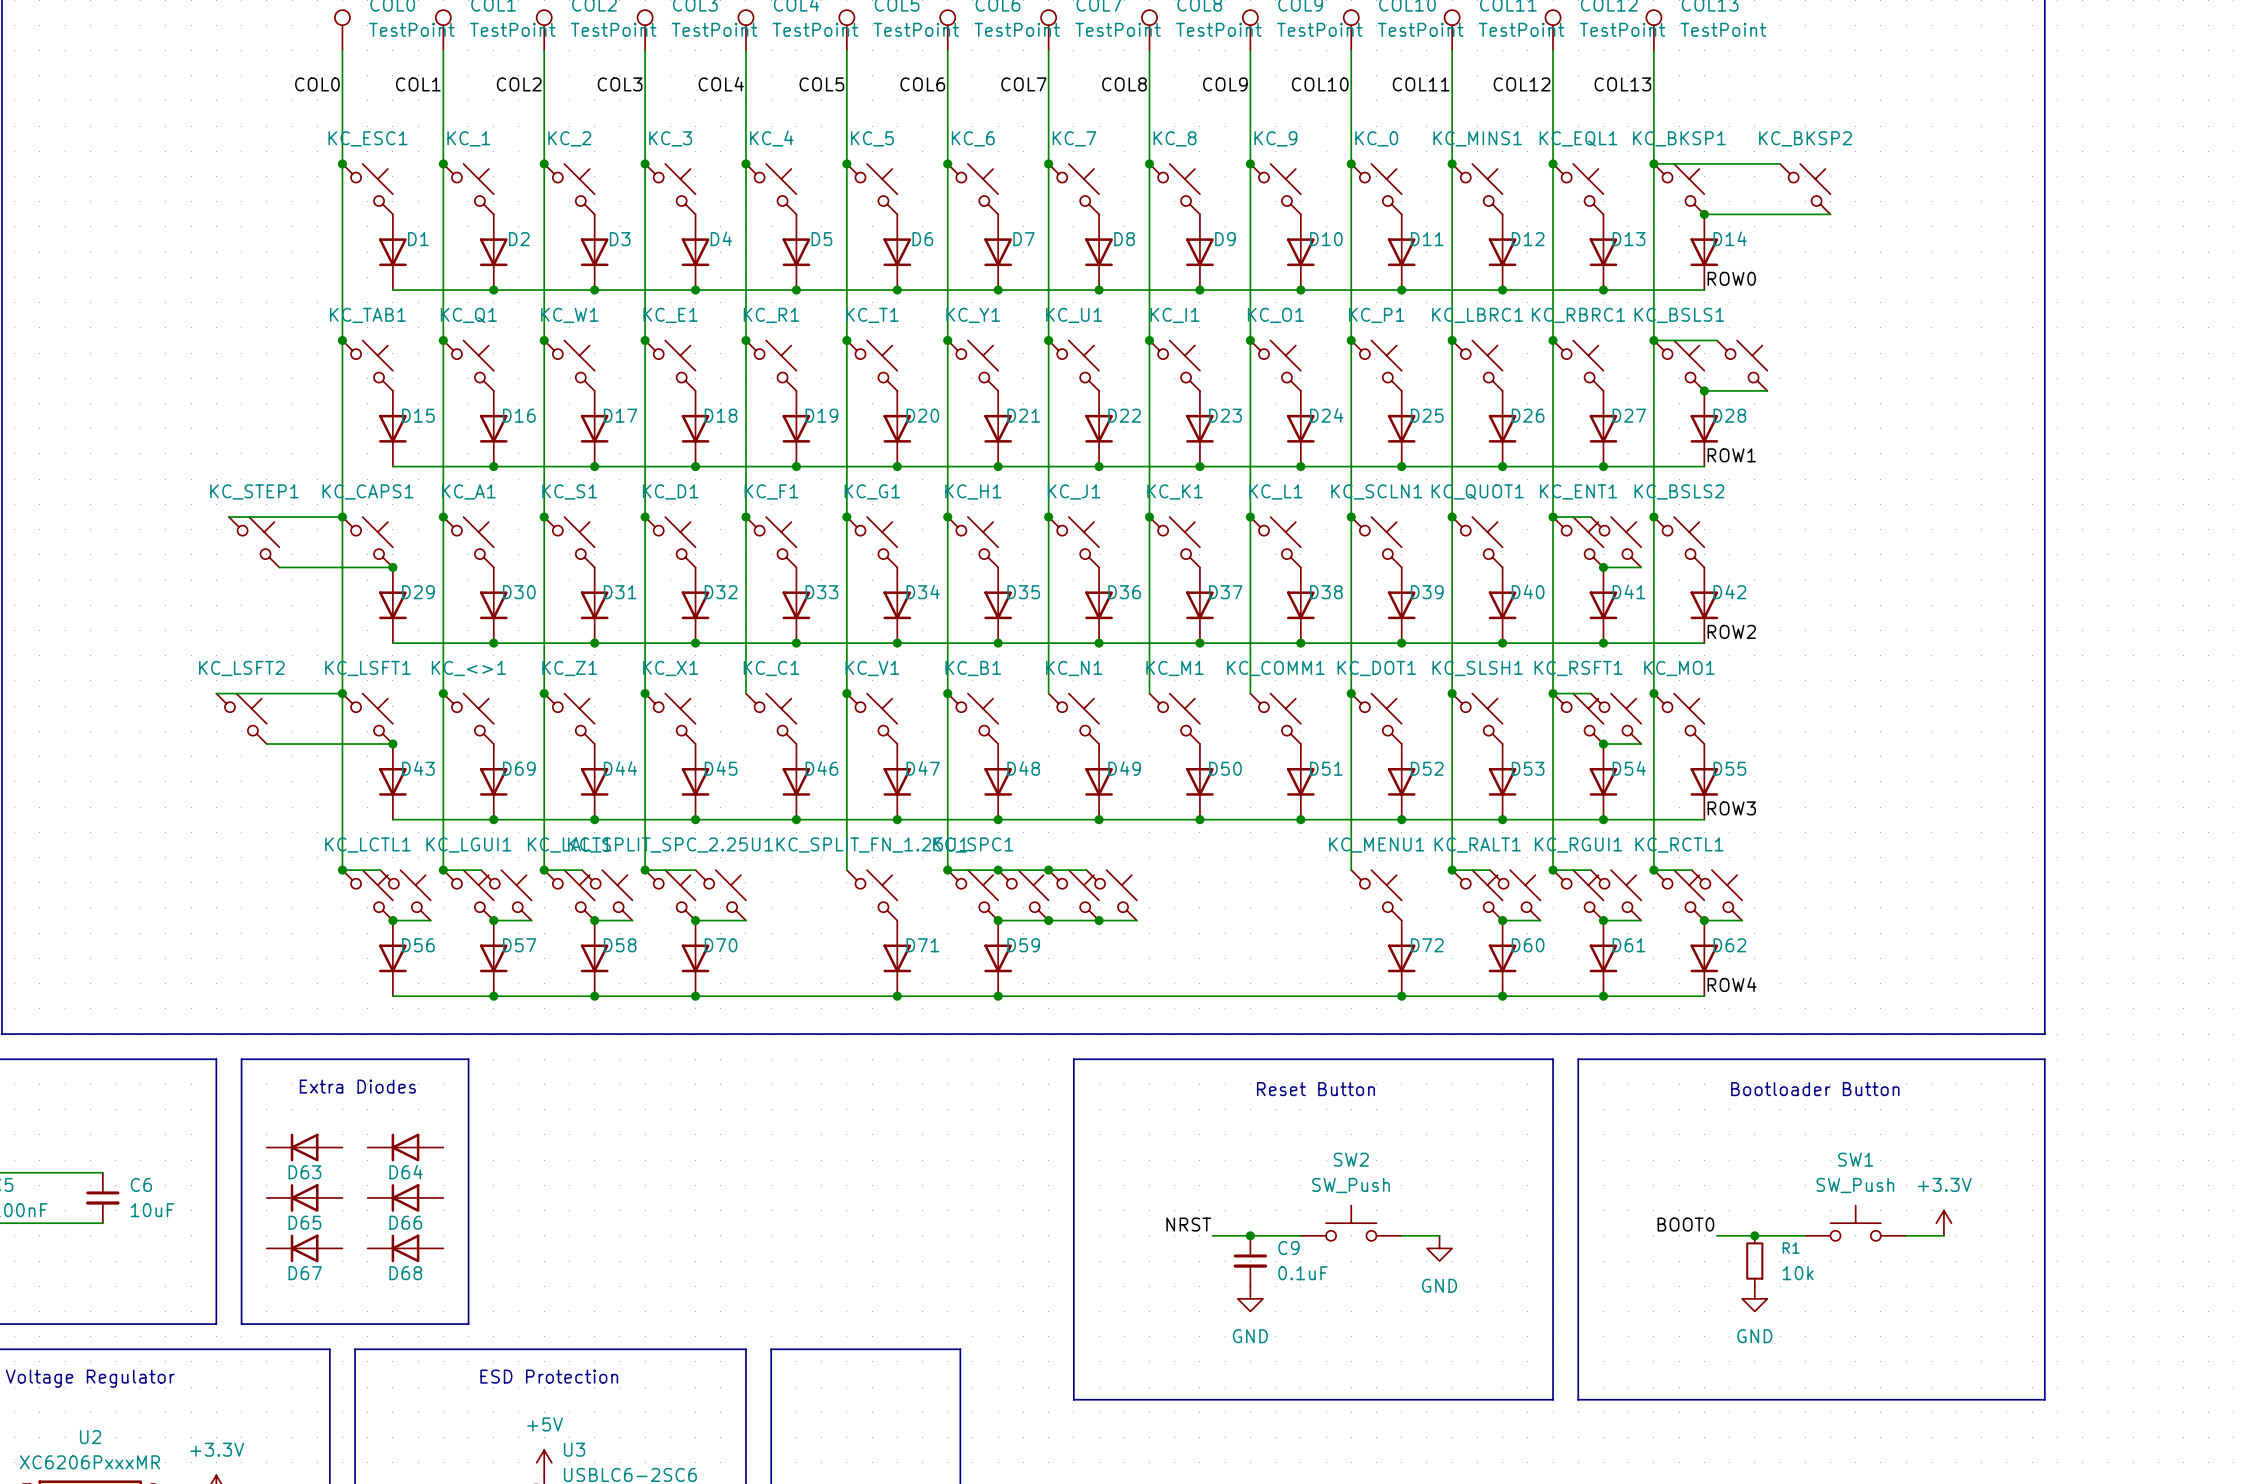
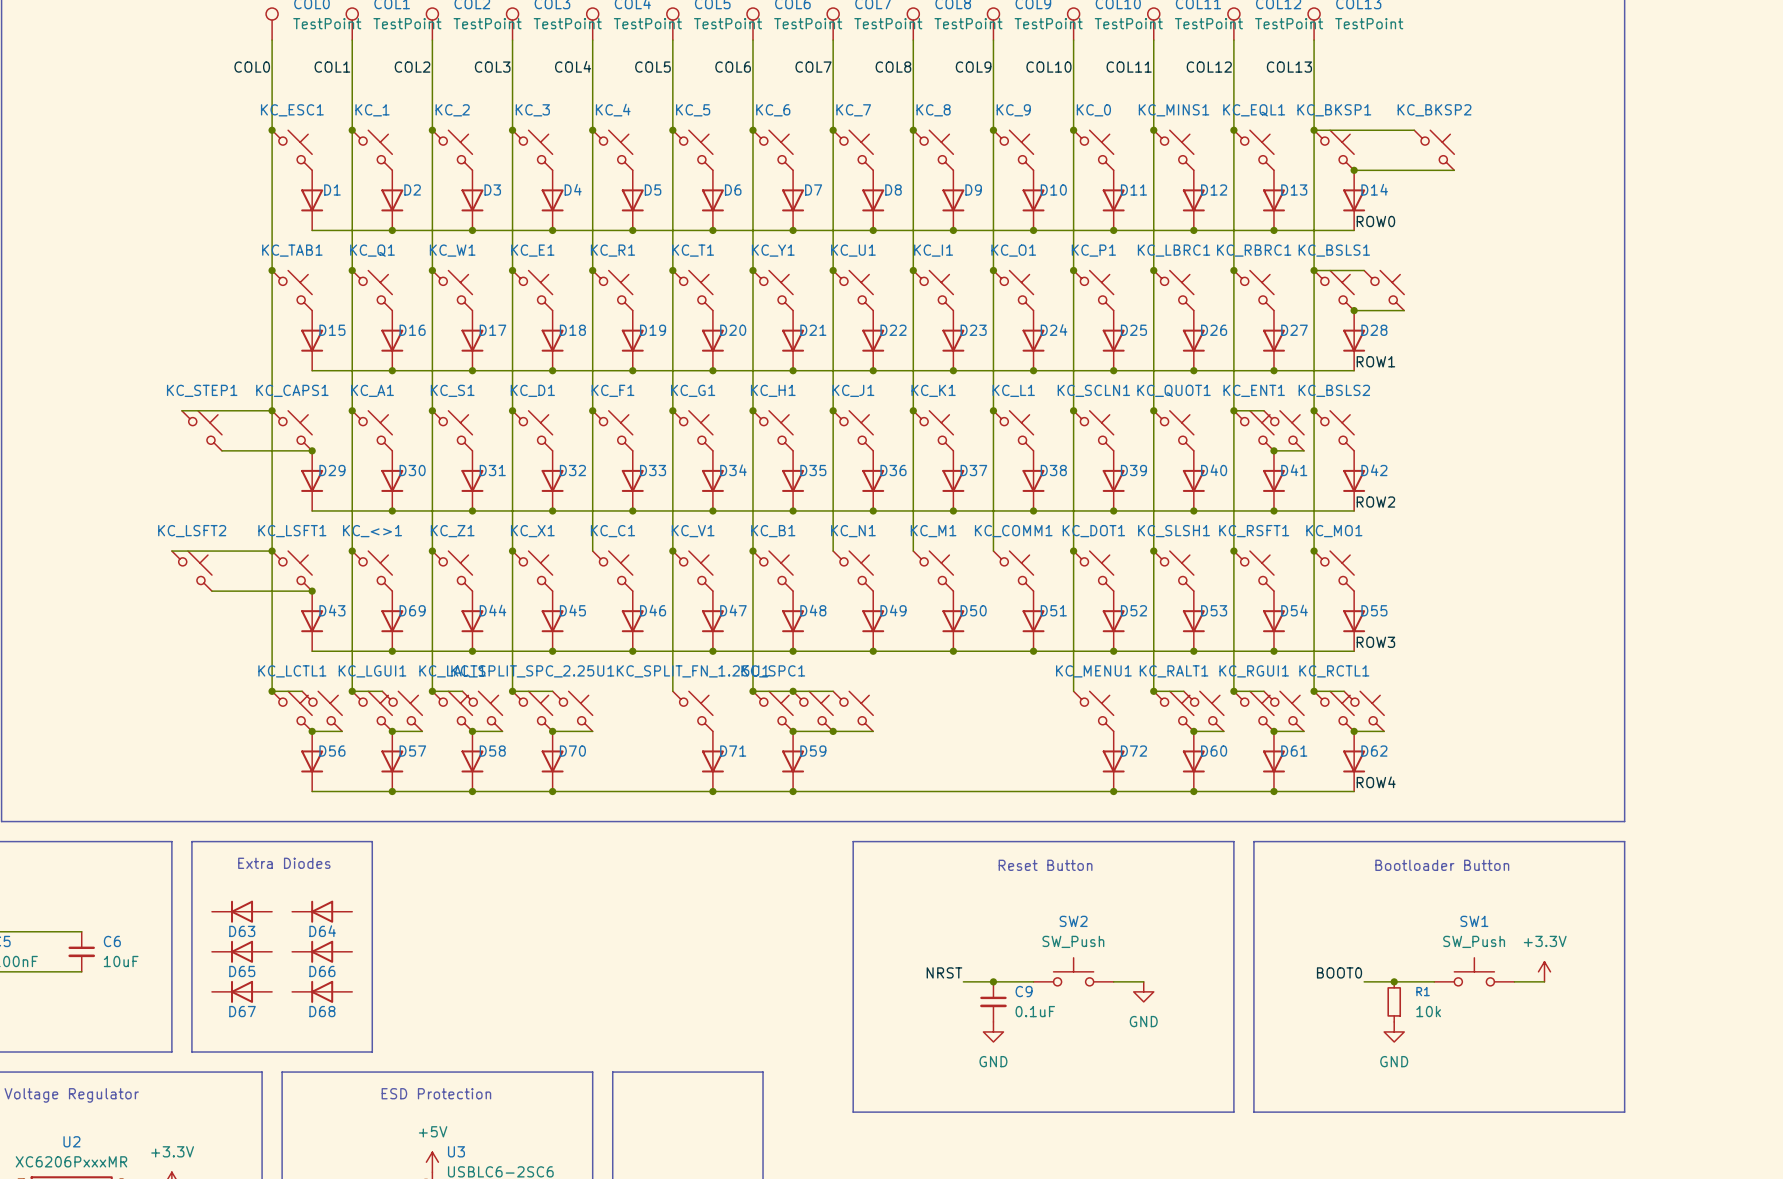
wire: (1553, 693) (1590, 693) -> none
part: (1616, 718) -> none
wire: (1603, 744) (1641, 744) -> none
junction: (1603, 744) -> none
wire: (1048, 870) (1086, 870) -> none
junction: (1048, 870) -> none
part: (1111, 895) -> none
wire: (1099, 920) (1136, 920) -> none
junction: (1099, 920) -> none

